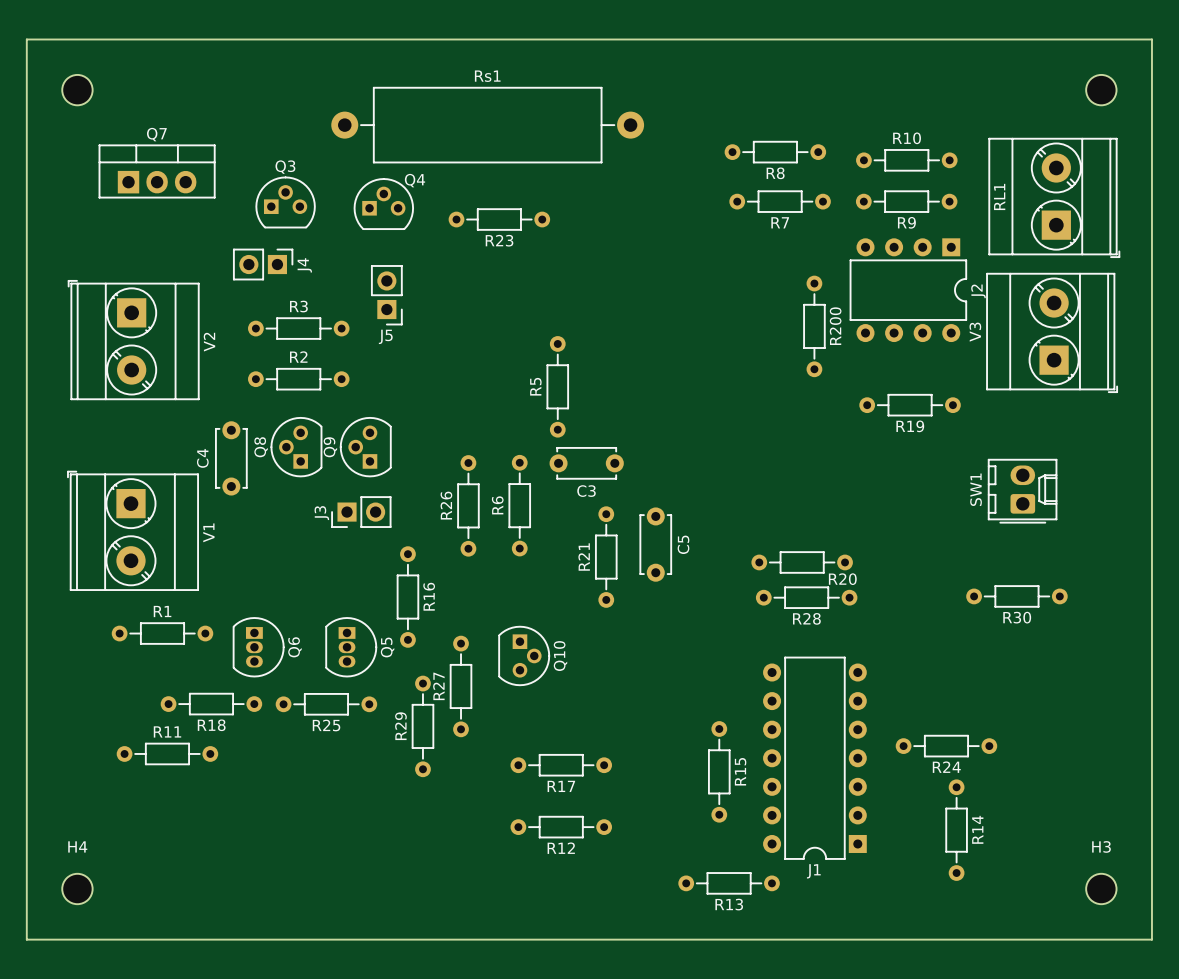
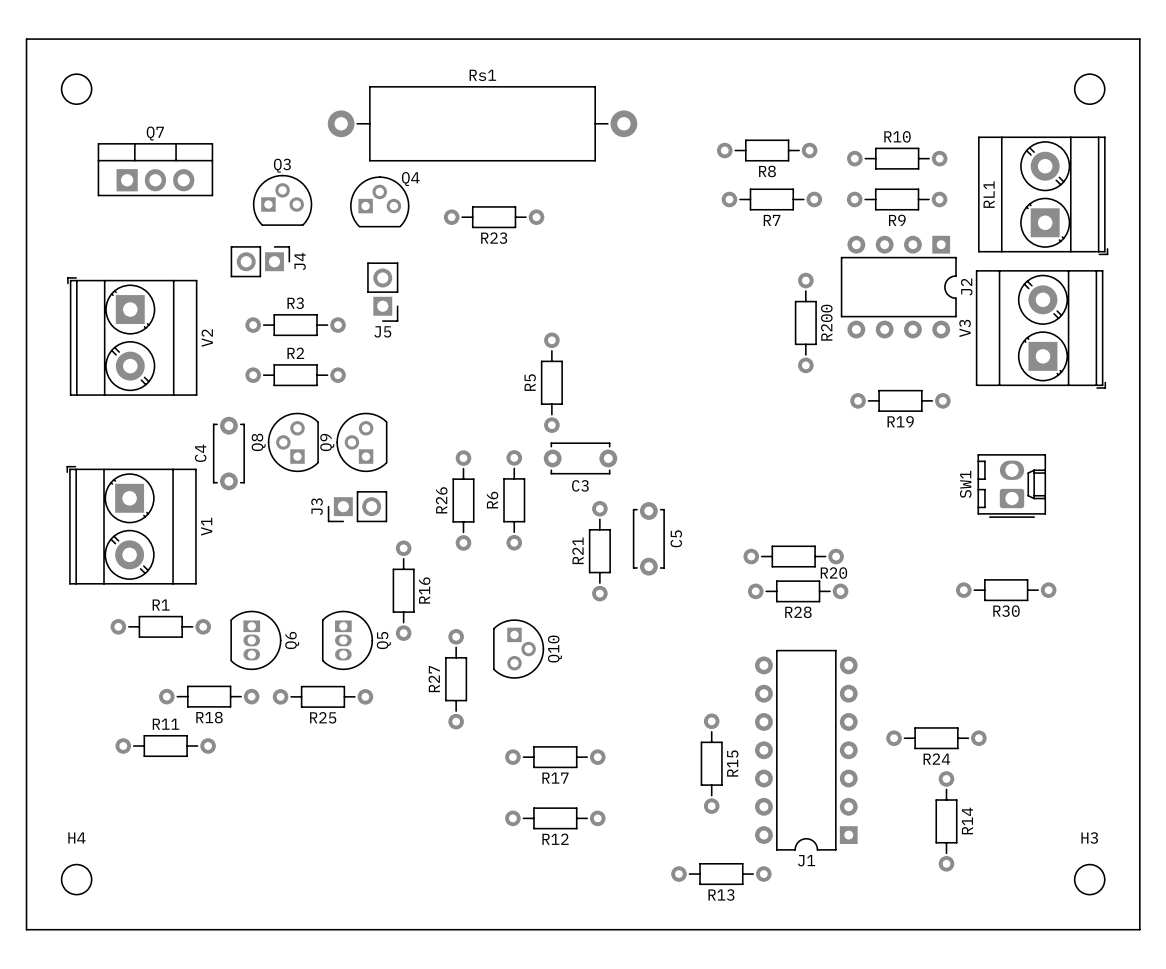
R29: (422, 726) -> none

